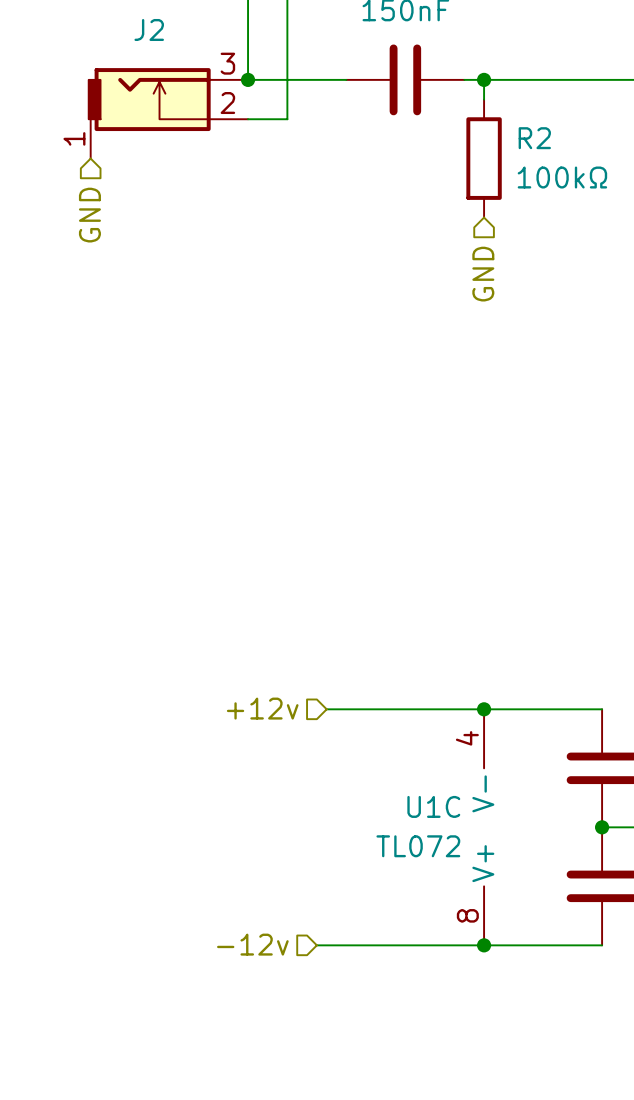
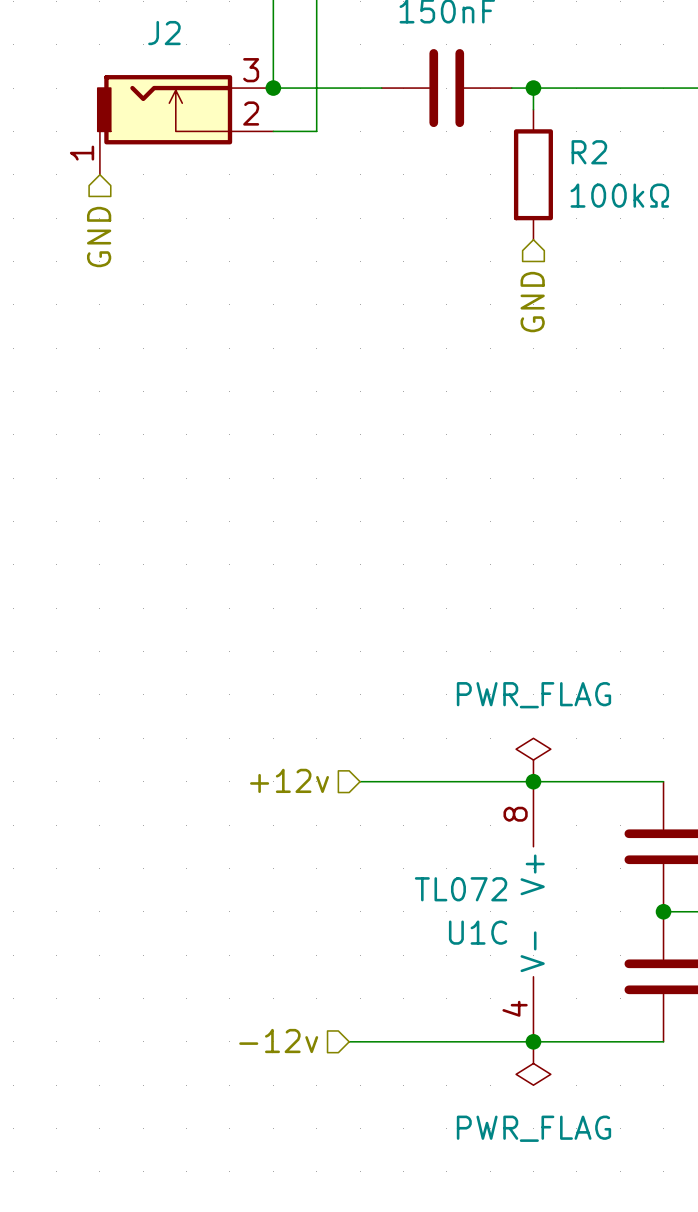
power symbol: none -> PWR_FLAG (533, 760)
U1C name position: U1C (433, 806) -> U1C (478, 932)
U1C rotation: 0° (484, 827) -> 180° (533, 911)
U1C value position: TL072 (418, 846) -> TL072 (461, 889)
power symbol: none -> PWR_FLAG (533, 1063)

